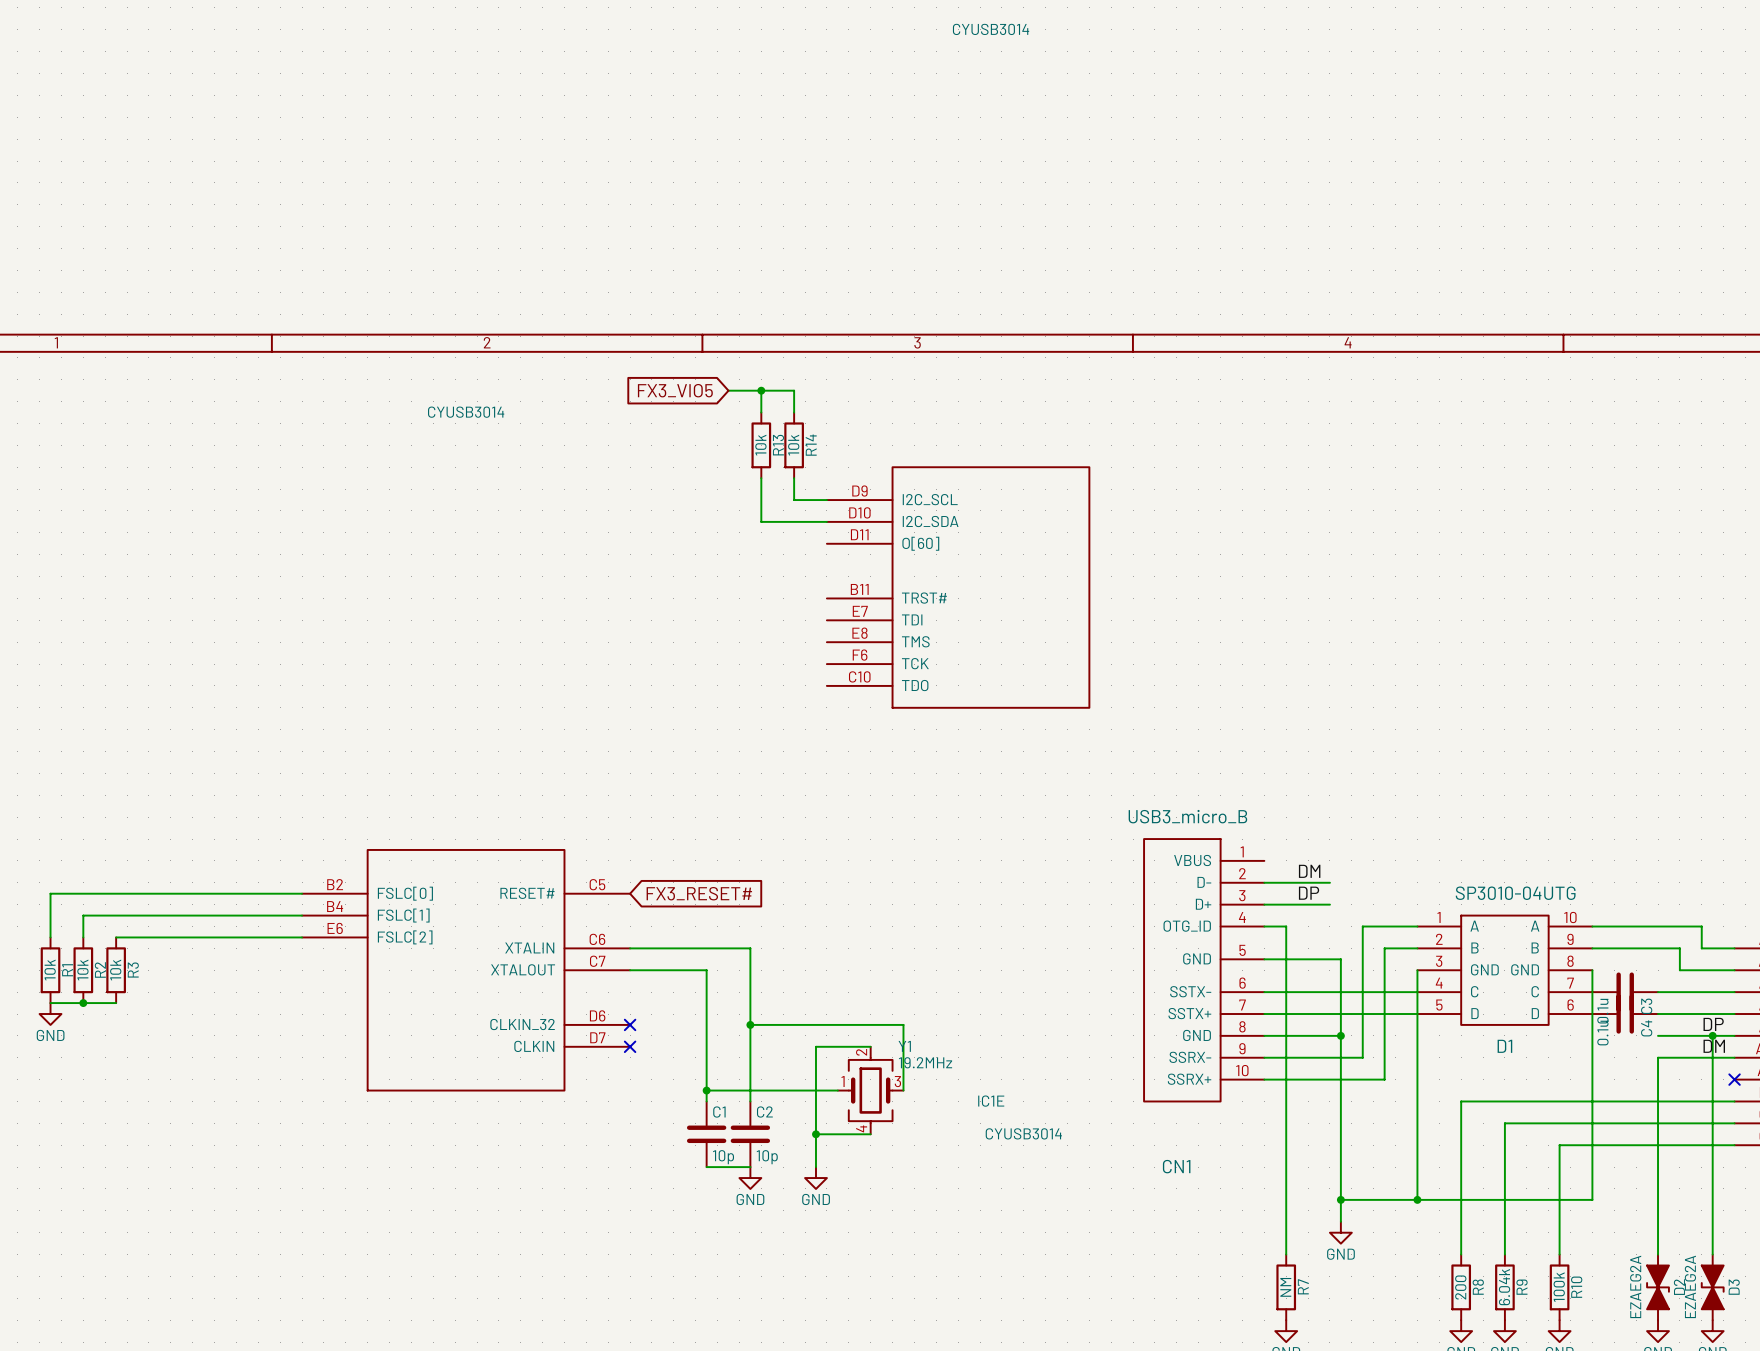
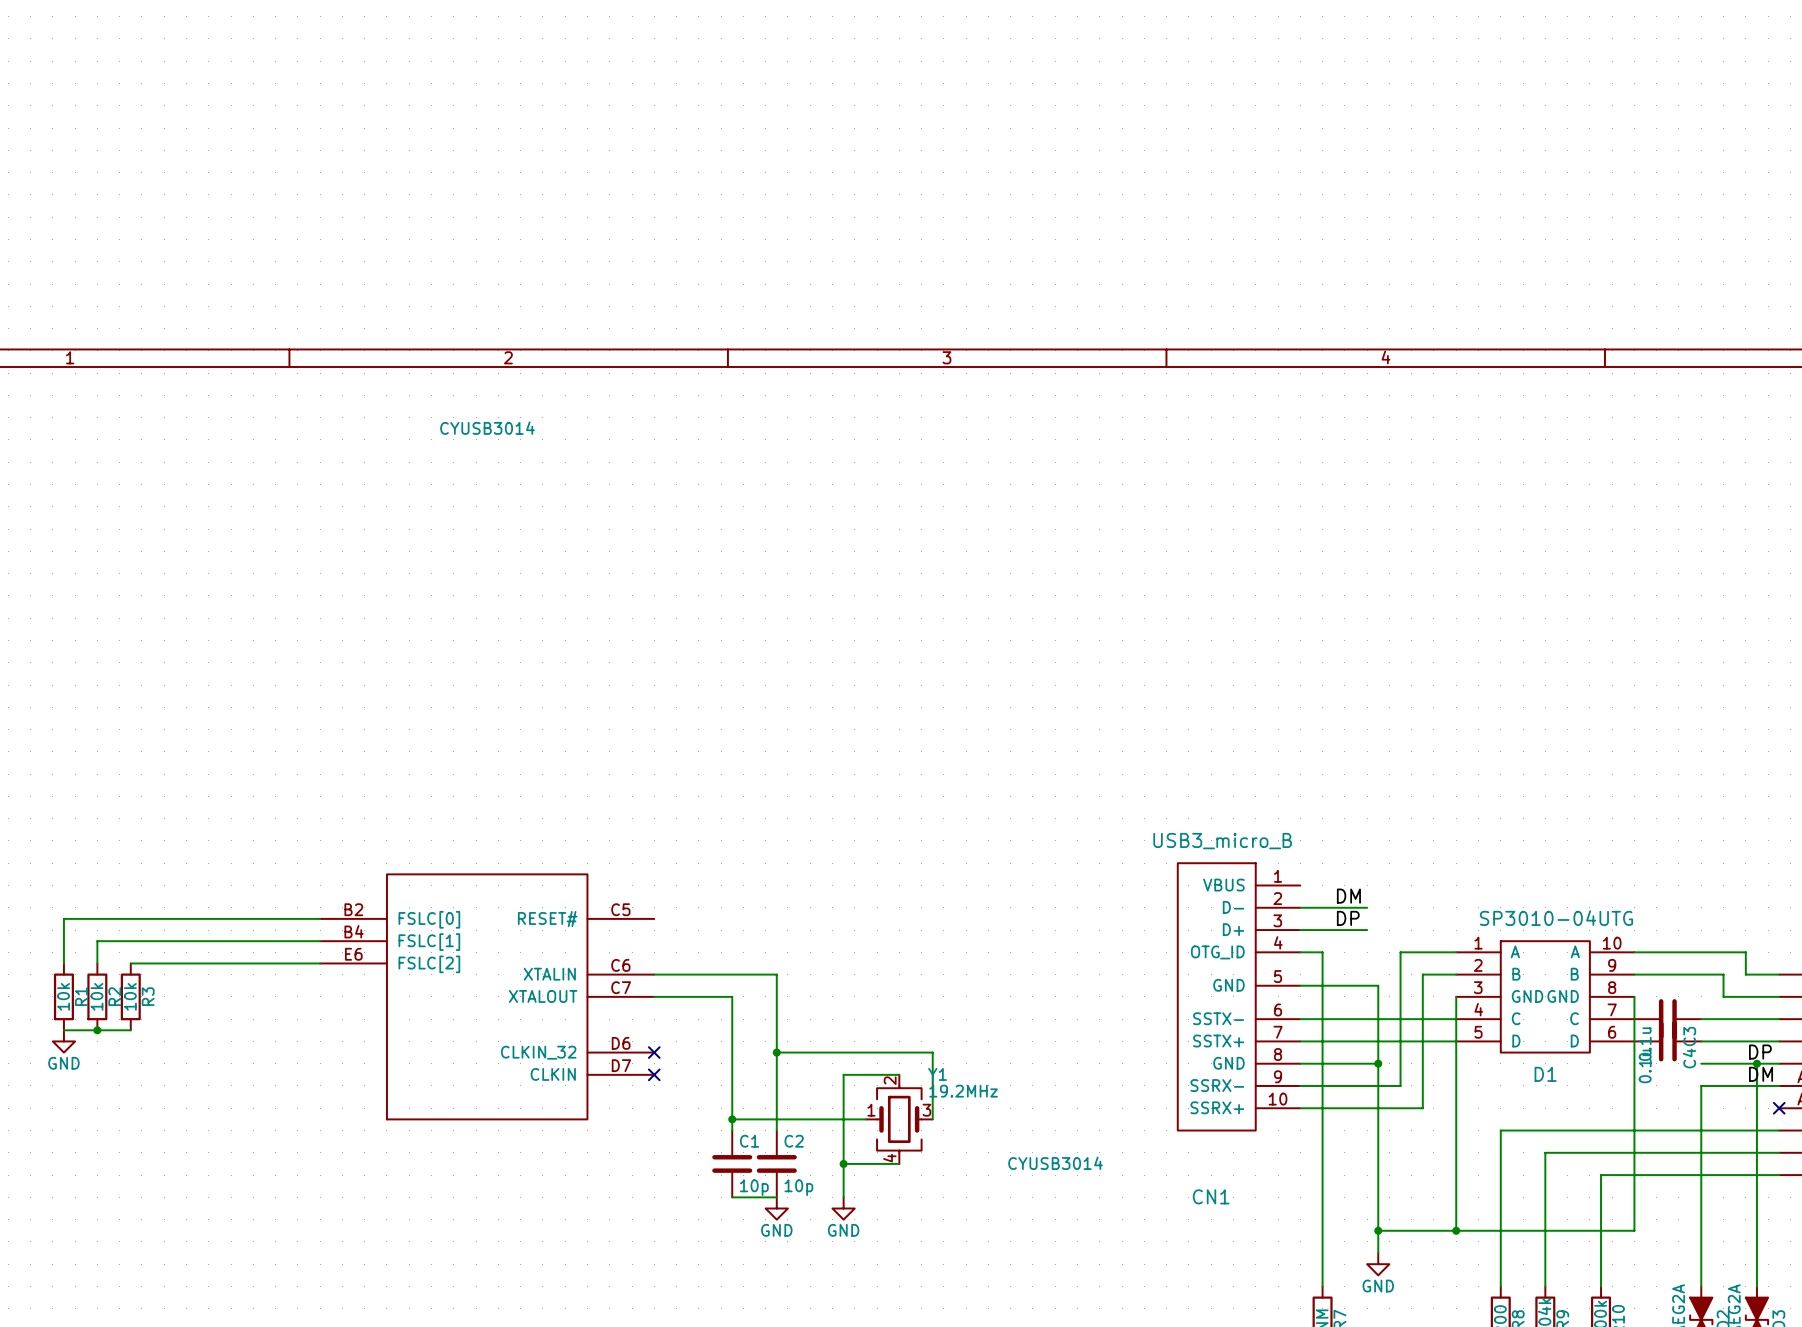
global label: FX3_VIO5 (675, 390) -> none
wire: (728, 390) (794, 390) (794, 412) -> none
wire: (761, 390) (761, 412) -> none
junction: (761, 390) -> none
R13: 10k (761, 445) -> none
R14: 10k (794, 445) -> none
wire: (761, 478) (761, 521) (826, 521) -> none
wire: (794, 478) (794, 500) (826, 500) -> none
IC1E: CYUSB3014 (958, 587) -> none
global label: FX3_RESET# (699, 893) -> none

